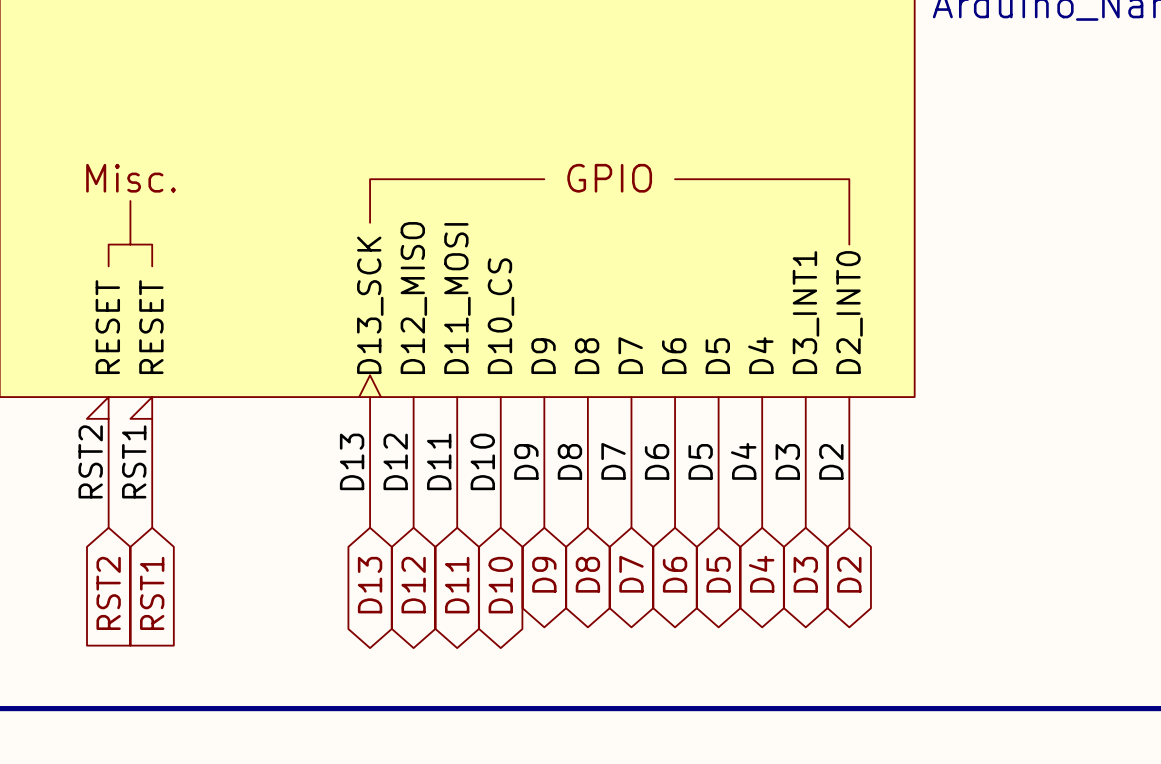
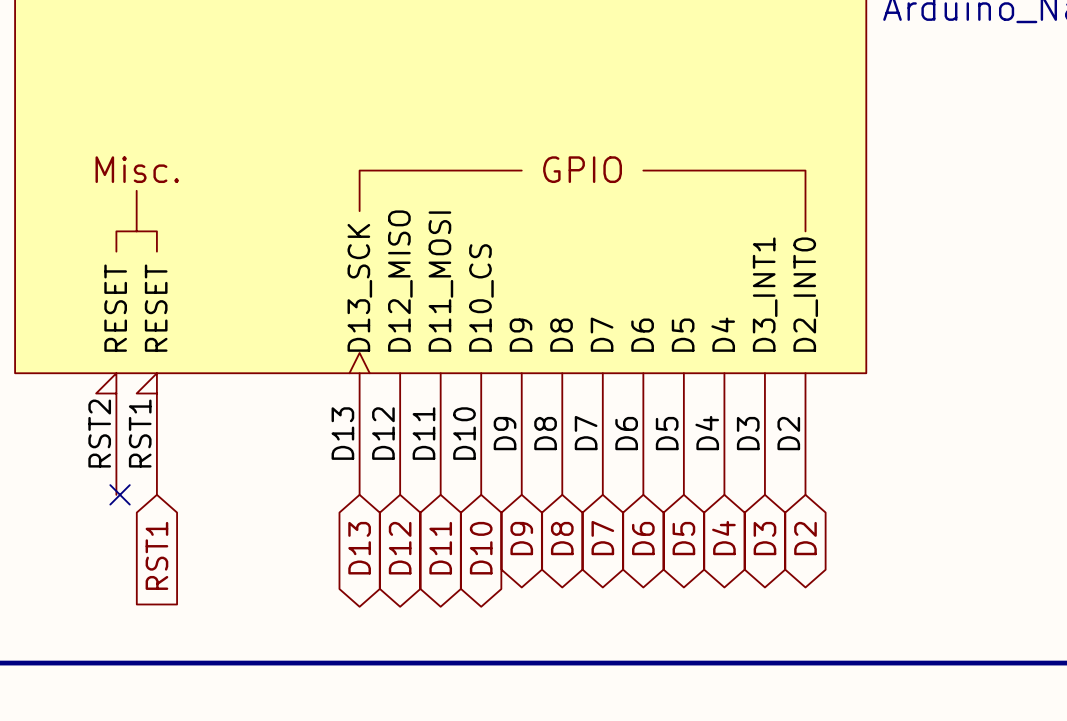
no-connect mark: none -> (120, 494)
global label: RST2 (108, 593) -> none

